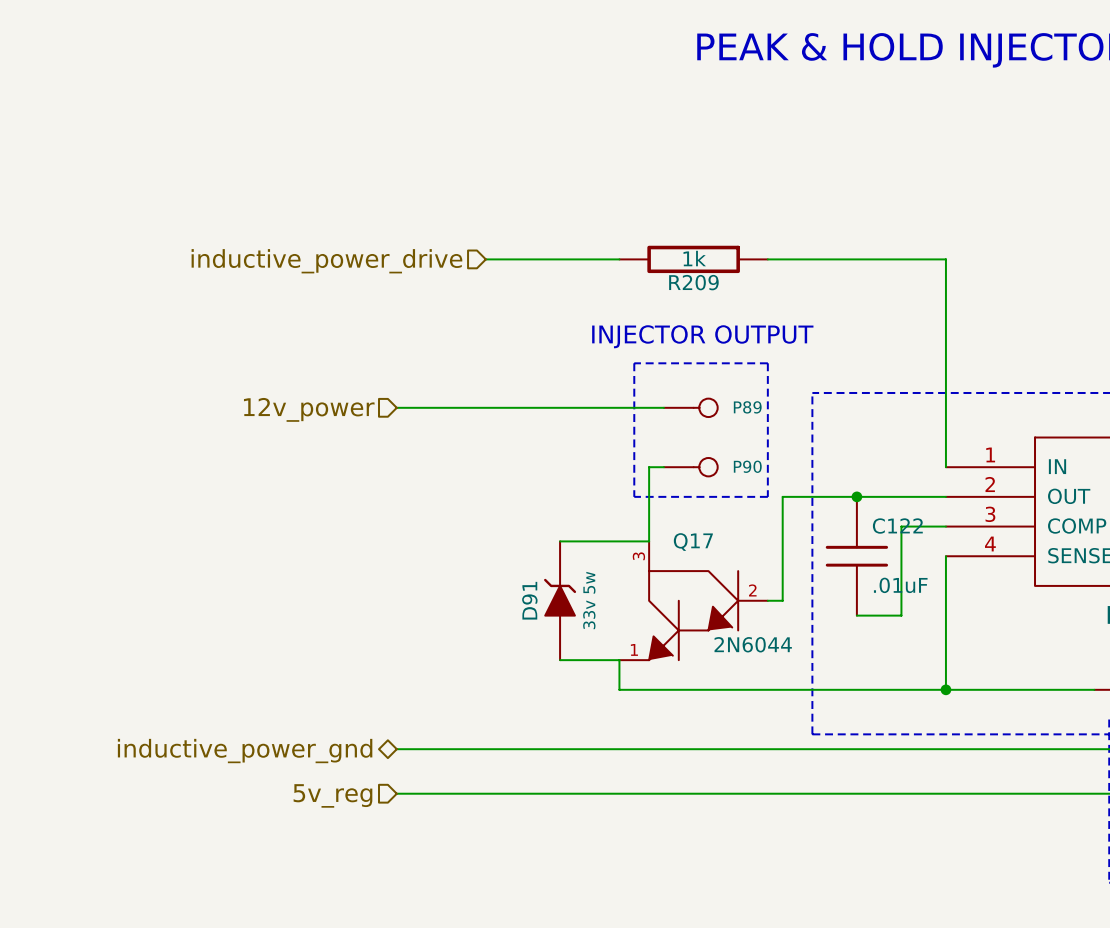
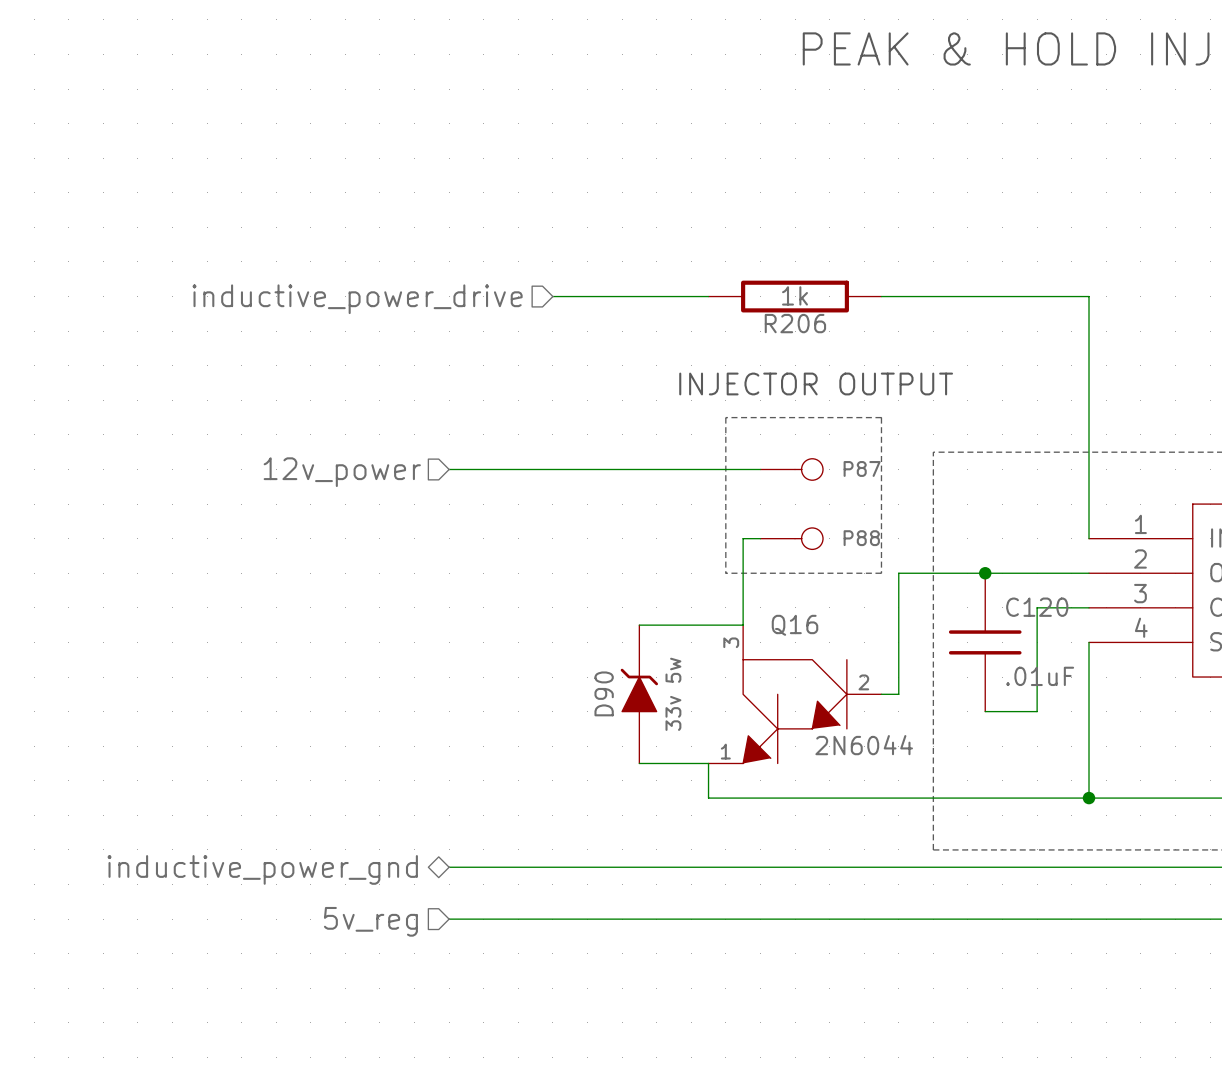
R209 name: R209 (693, 282) -> R206 (795, 323)
P89 name: P89 (747, 407) -> P87 (862, 468)
P90 name: P90 (747, 466) -> P88 (861, 538)
C122 name: C122 (897, 526) -> C120 (1037, 607)
Q17 name: Q17 (693, 542) -> Q16 (795, 625)
D91 name: D91 (529, 600) -> D90 (604, 693)

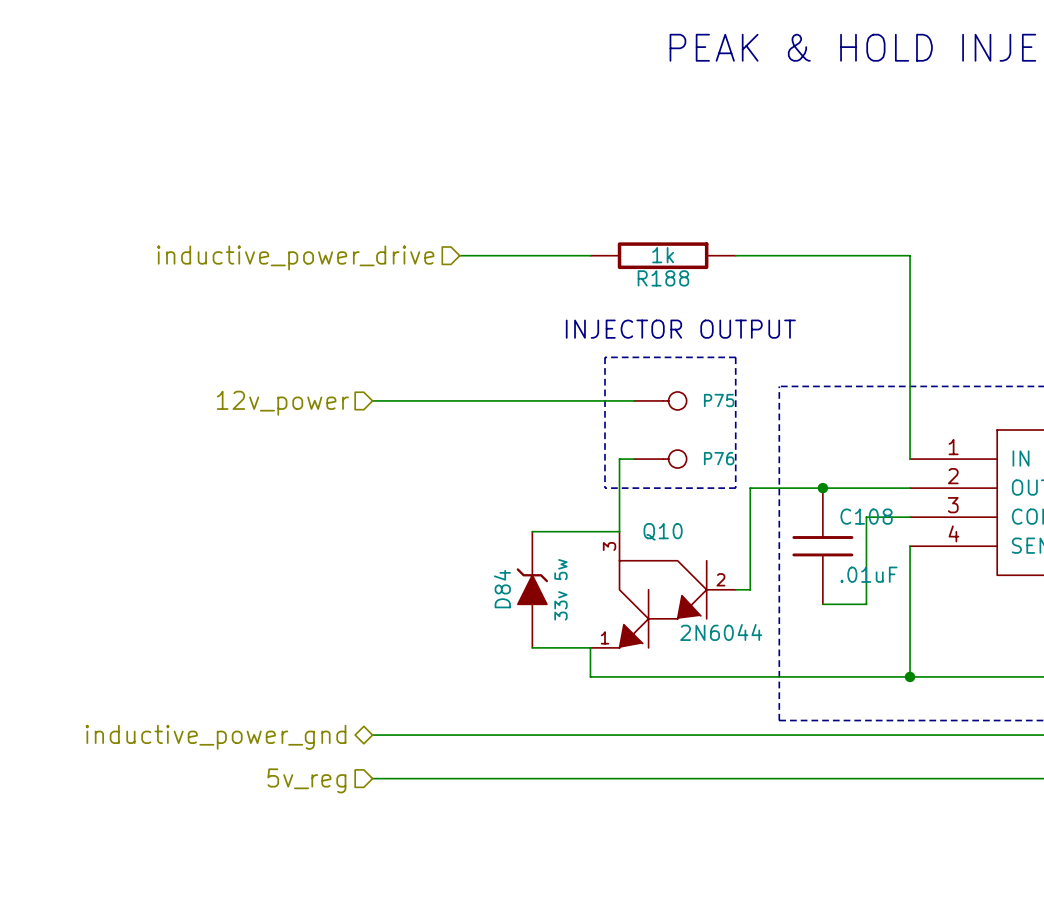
R206 name: R206 (795, 323) -> R188 (663, 278)
P87 name: P87 (862, 468) -> P75 (719, 400)
P88 name: P88 (861, 538) -> P76 (719, 458)
C120 name: C120 (1037, 607) -> C108 (866, 516)
Q16 name: Q16 (795, 625) -> Q10 (663, 531)
D90 name: D90 (604, 693) -> D84 (502, 589)

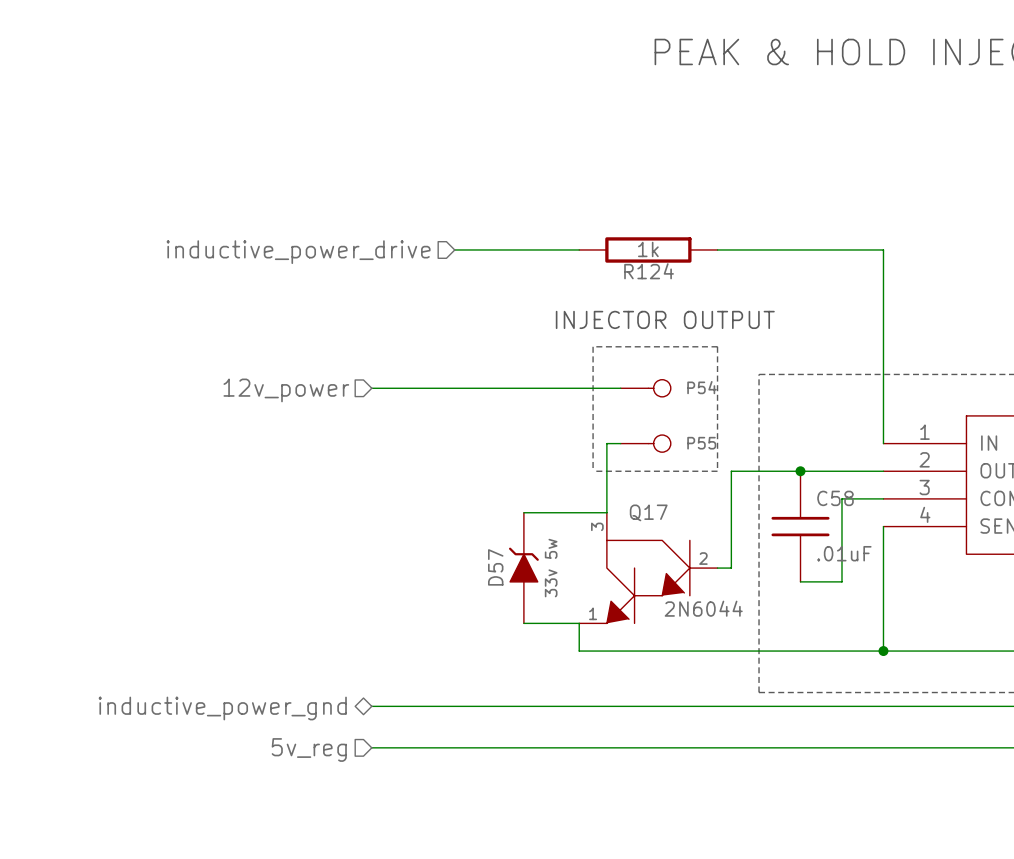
R188 name: R188 (663, 278) -> R124 (649, 271)
P75 name: P75 (719, 400) -> P54 (702, 387)
P76 name: P76 (719, 458) -> P55 (701, 443)
C108 name: C108 (866, 516) -> C58 (835, 498)
Q10 name: Q10 (663, 531) -> Q17 (648, 512)
D84 name: D84 (502, 589) -> D57 (495, 567)

